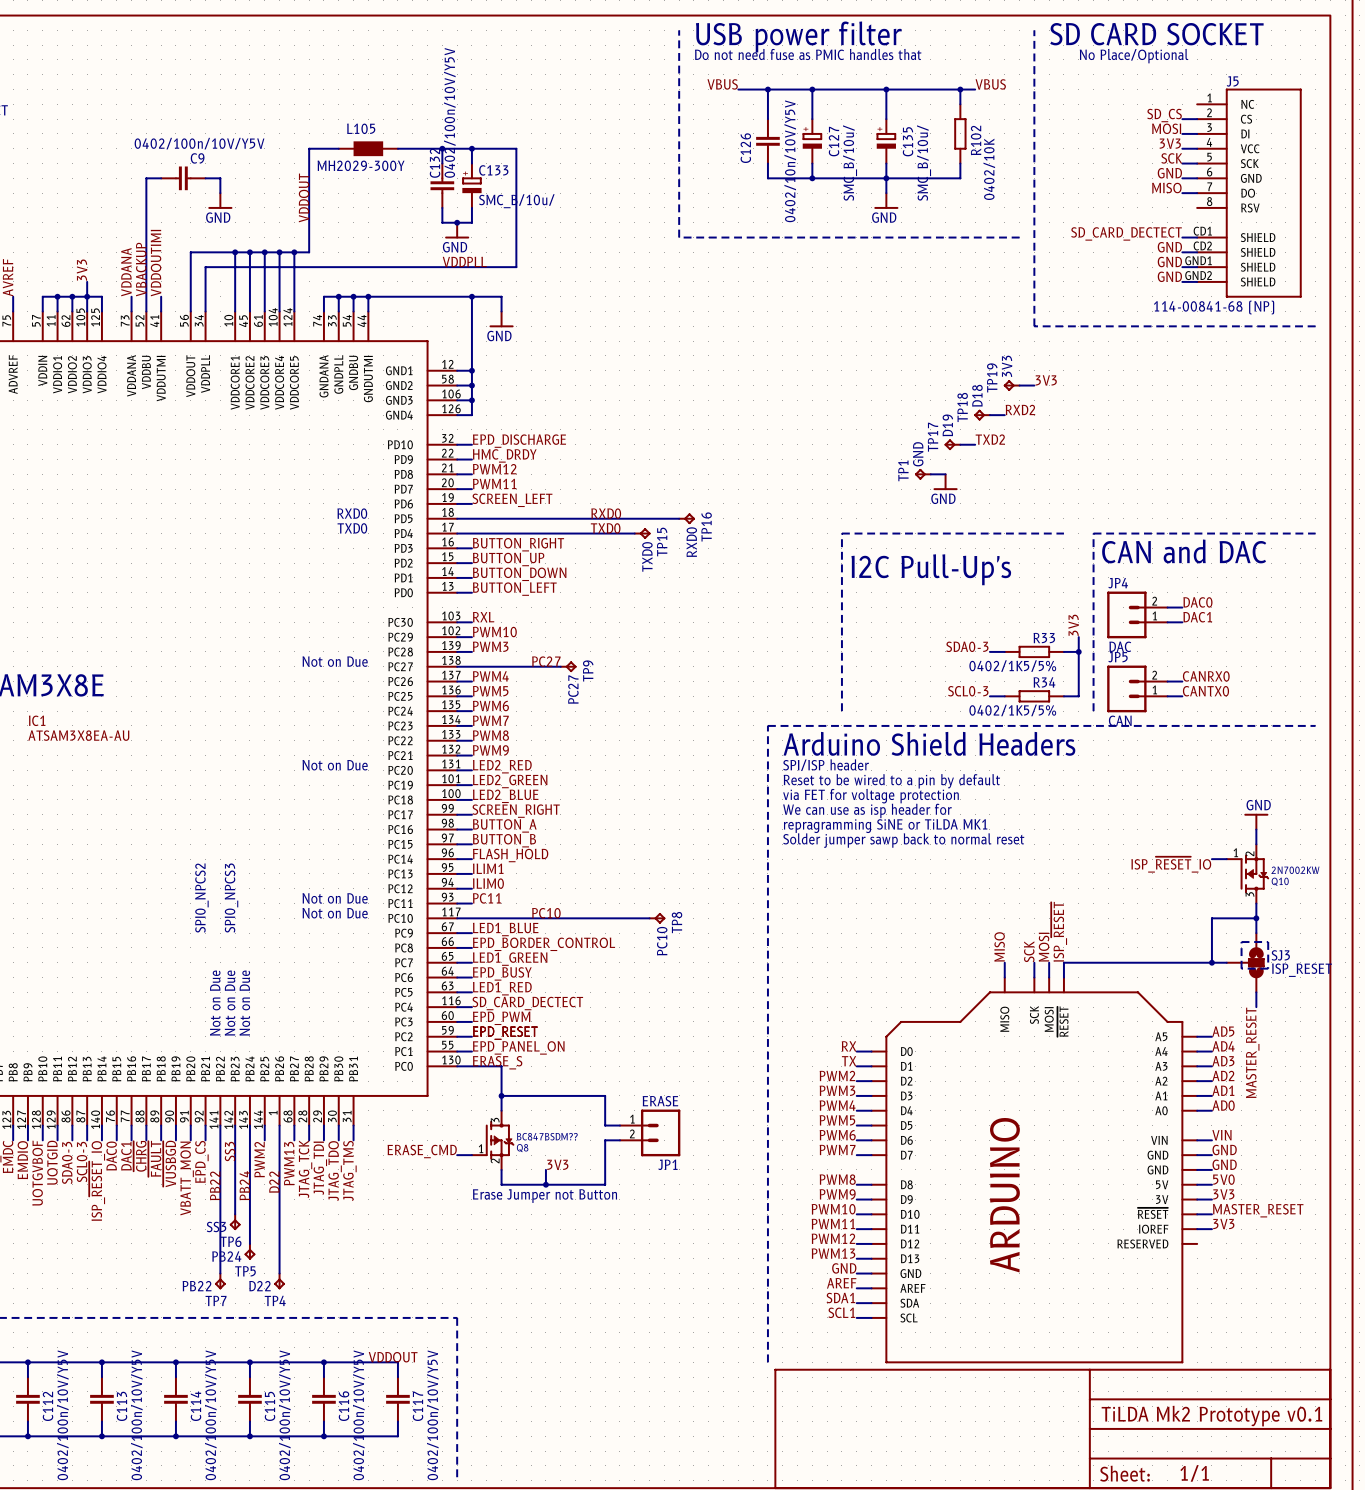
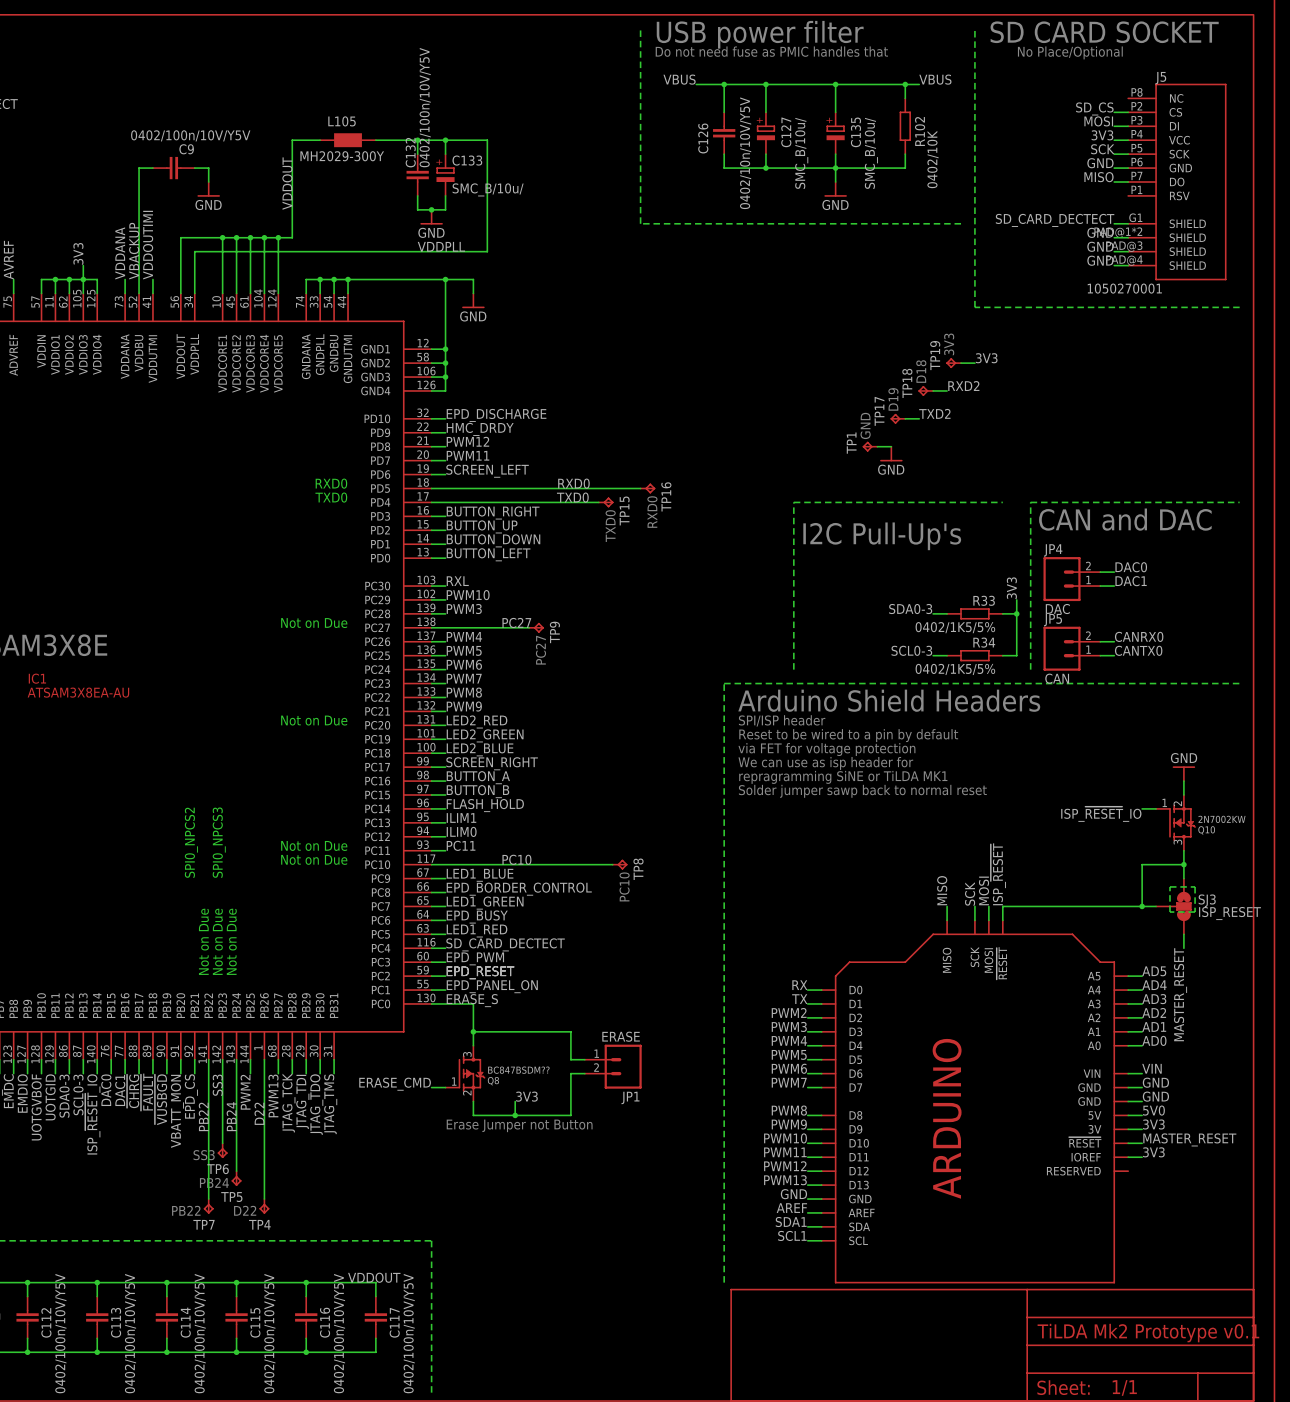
J5 symbol: [1197, 88, 1302, 298] -> [1128, 83, 1227, 281]
J5 value: 114-00841-68 (NP) (1214, 307) -> 1050270001 (1124, 288)

